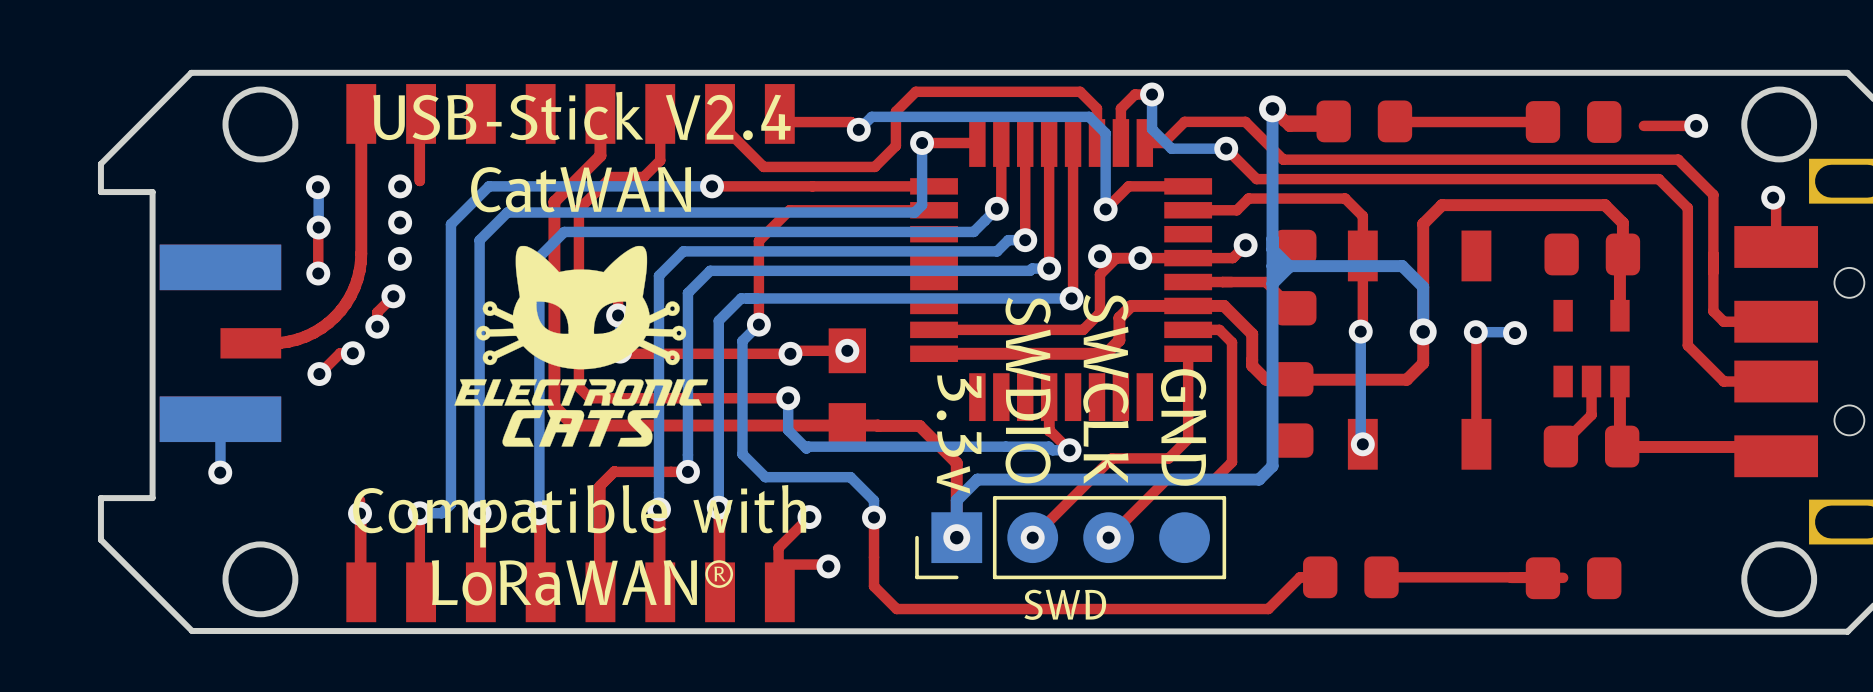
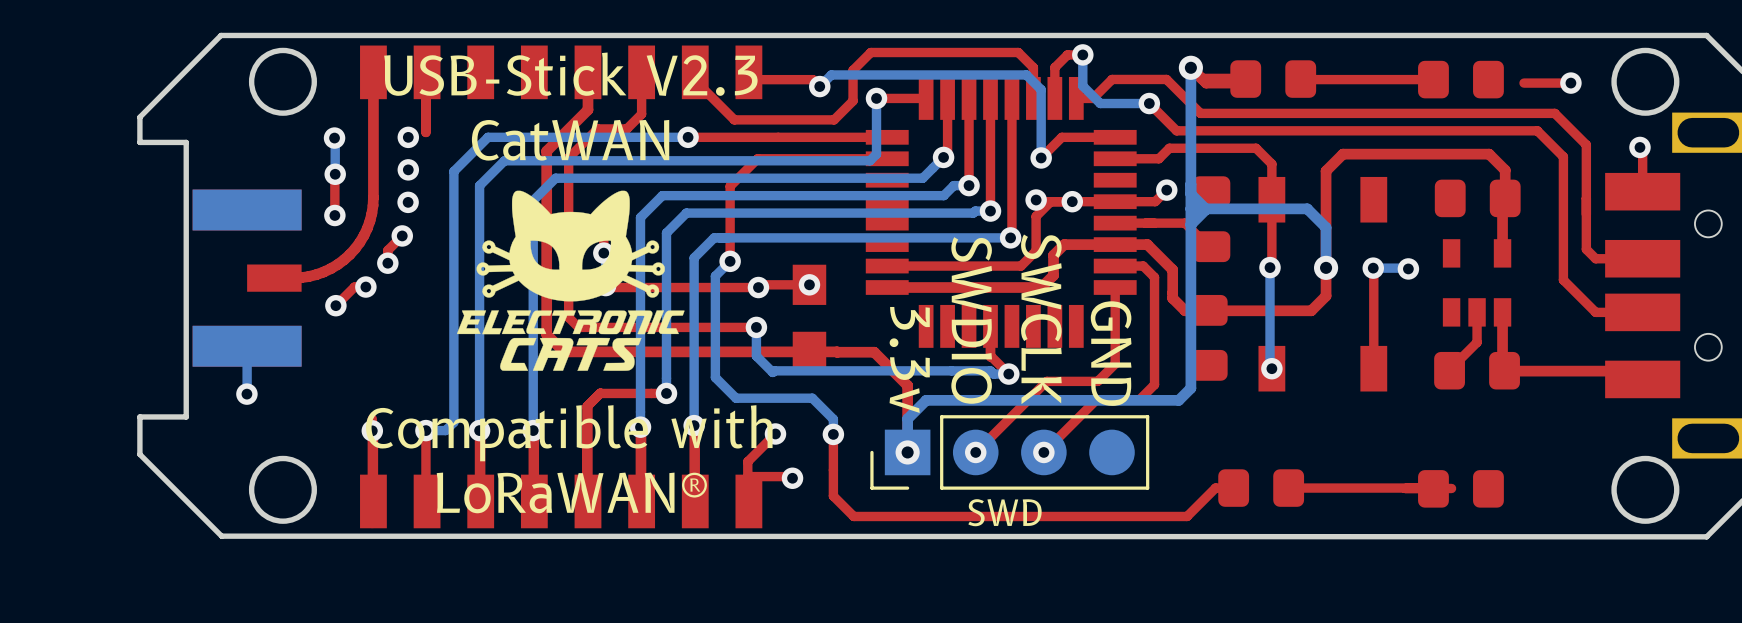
text: USB-Stick V2.4 (582, 116) -> USB-Stick V2.3 (570, 74)

